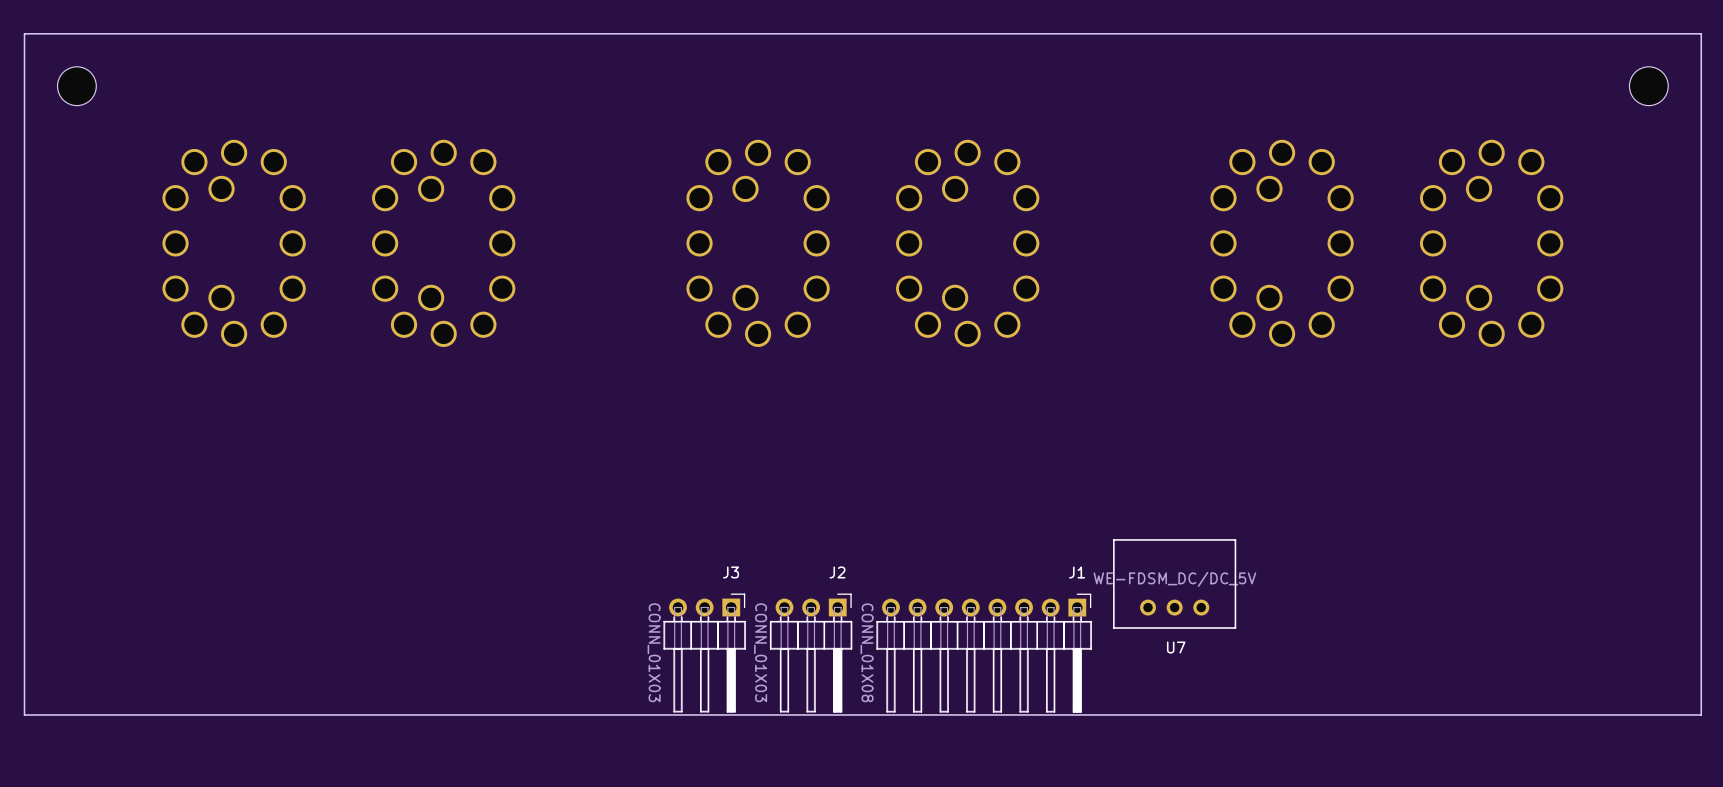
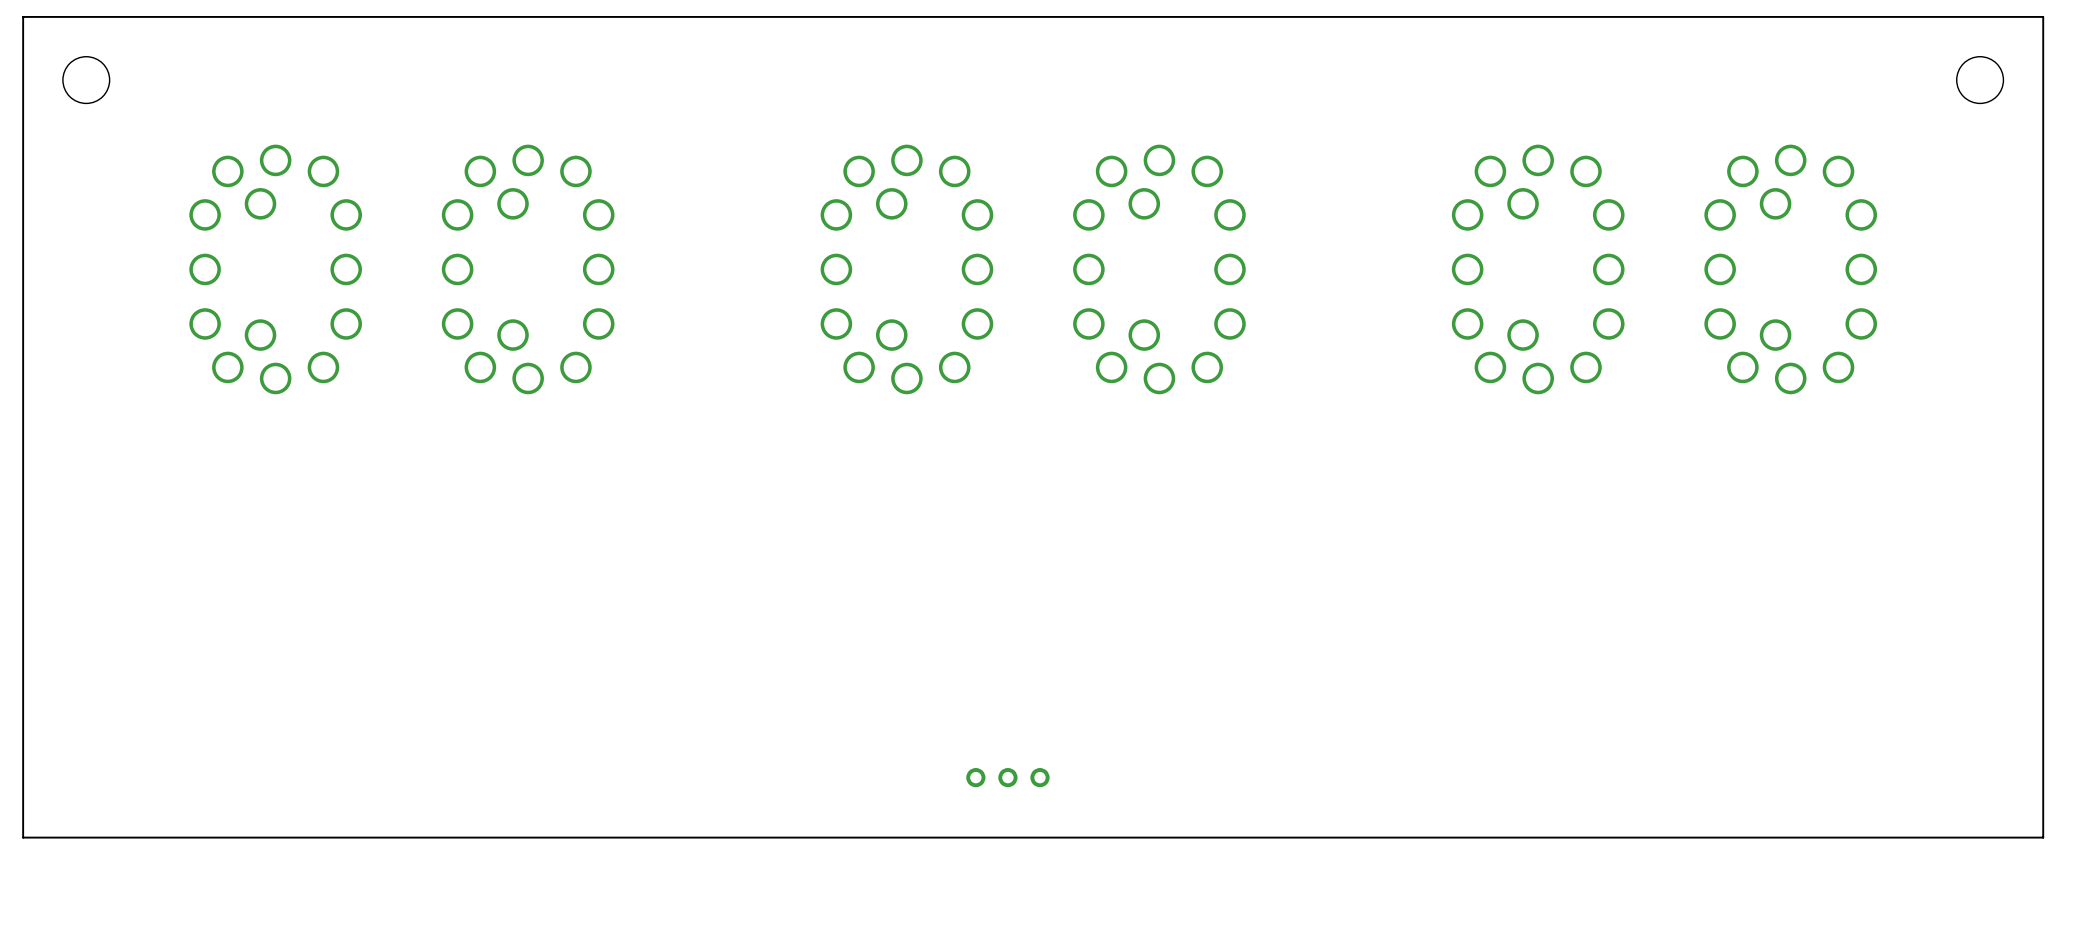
U7: WE-FDSM_DC/DC_5V (1174, 583) -> none
J3: CONN_01X03 (704, 653) -> none
J2: CONN_01X03 (811, 653) -> none
J1: CONN_01X08 (984, 653) -> none
part: none -> (1007, 777)

